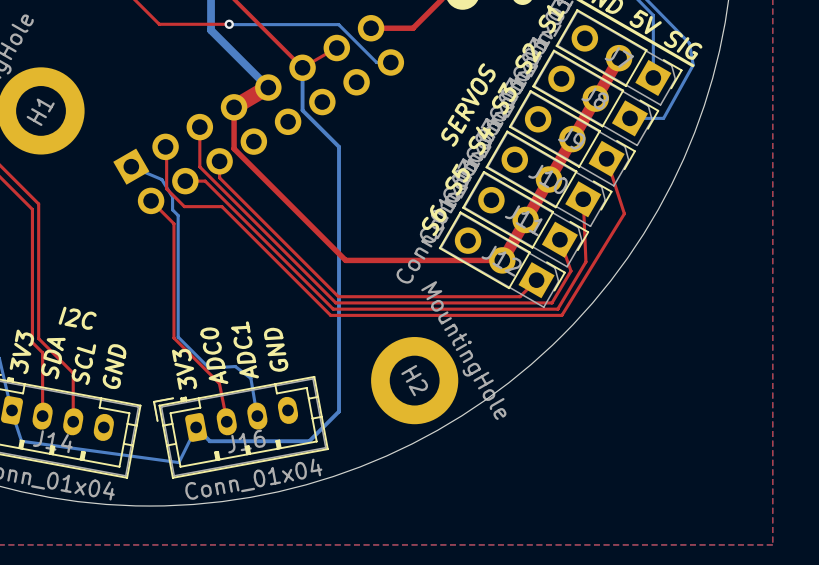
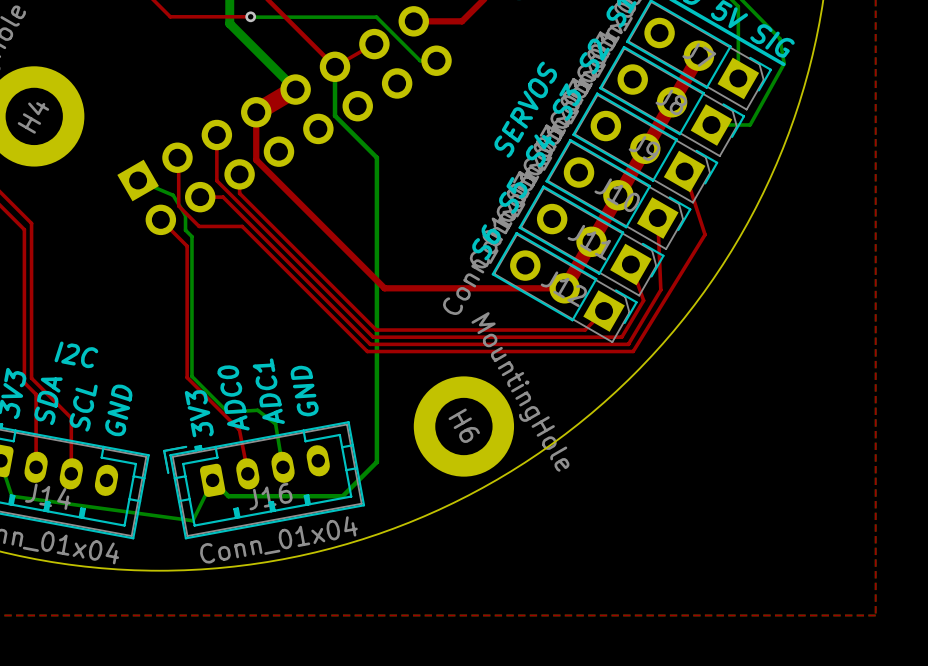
H1 name: H1 (40, 112) -> H4 (33, 117)
H2 name: H2 (414, 380) -> H6 (464, 425)

